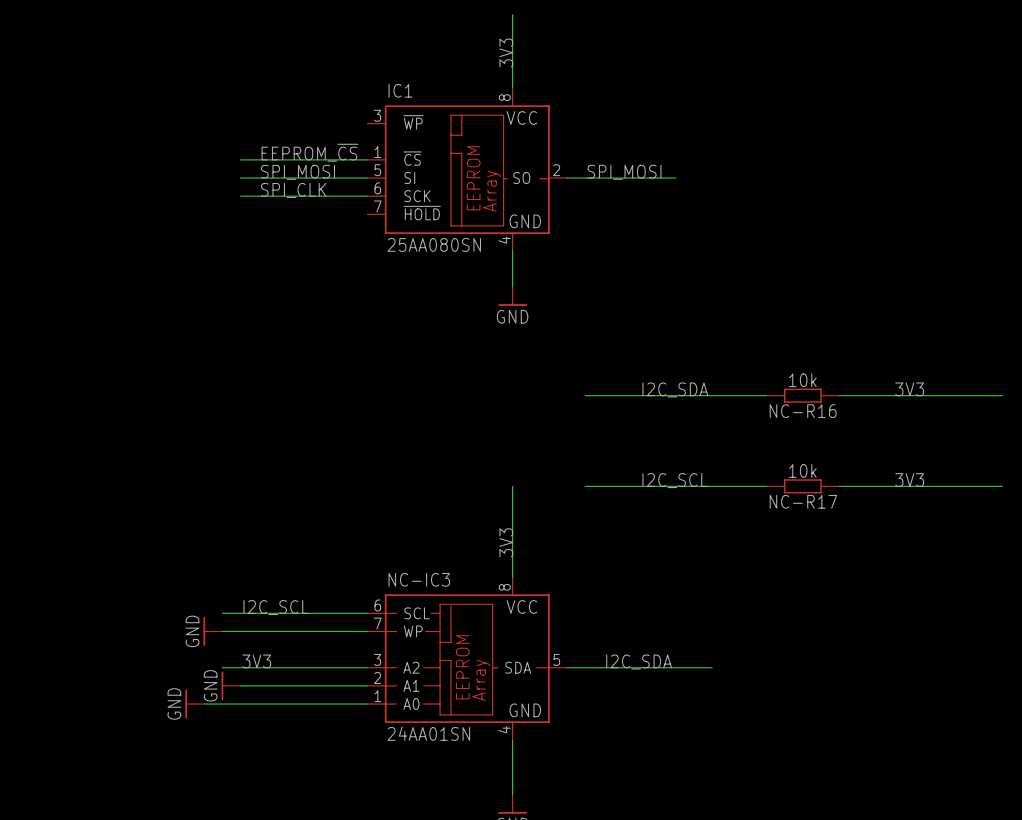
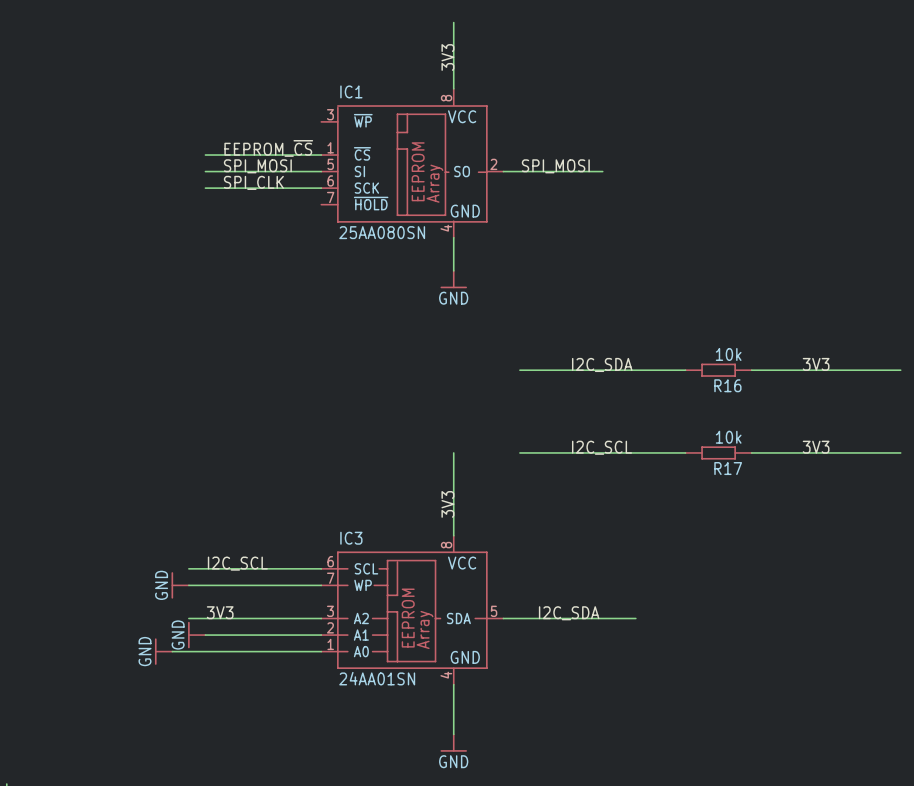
NC-R16: 10k (802, 395) -> none
R16: none -> 10k (718, 370)
NC-R17: 10k (802, 486) -> none
R17: none -> 10k (718, 452)
NC-IC3 name: NC-IC3 (419, 579) -> IC3 (351, 538)

